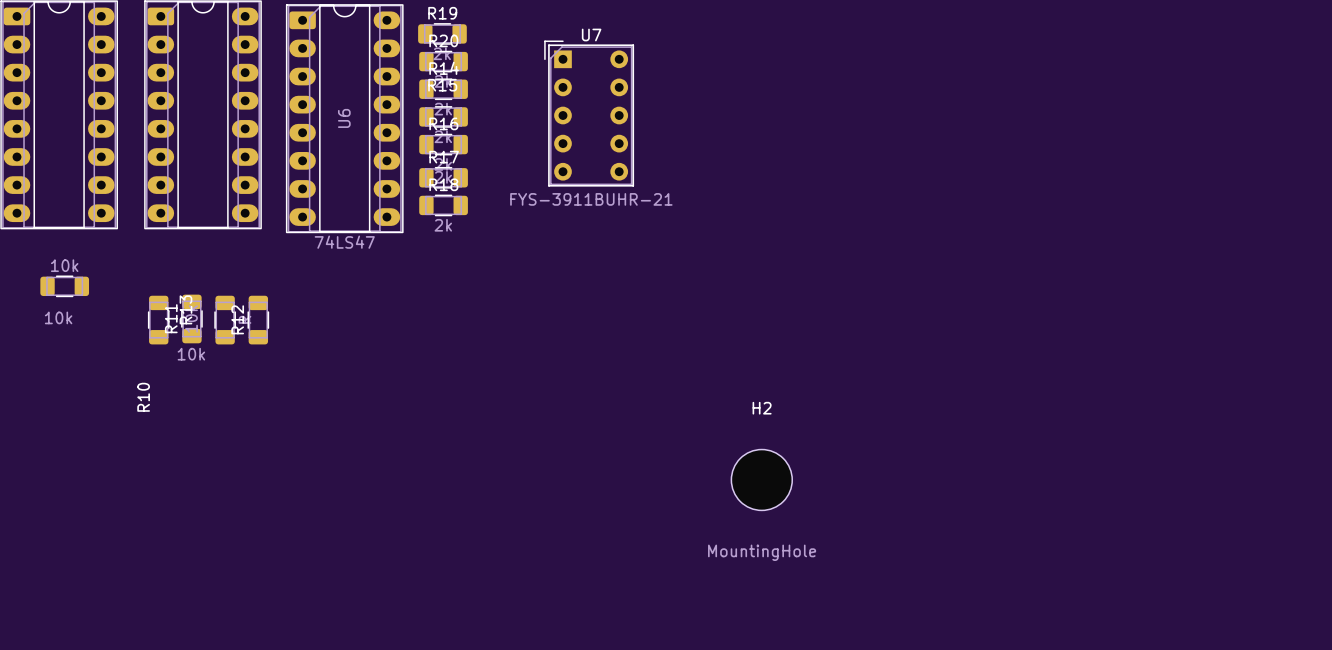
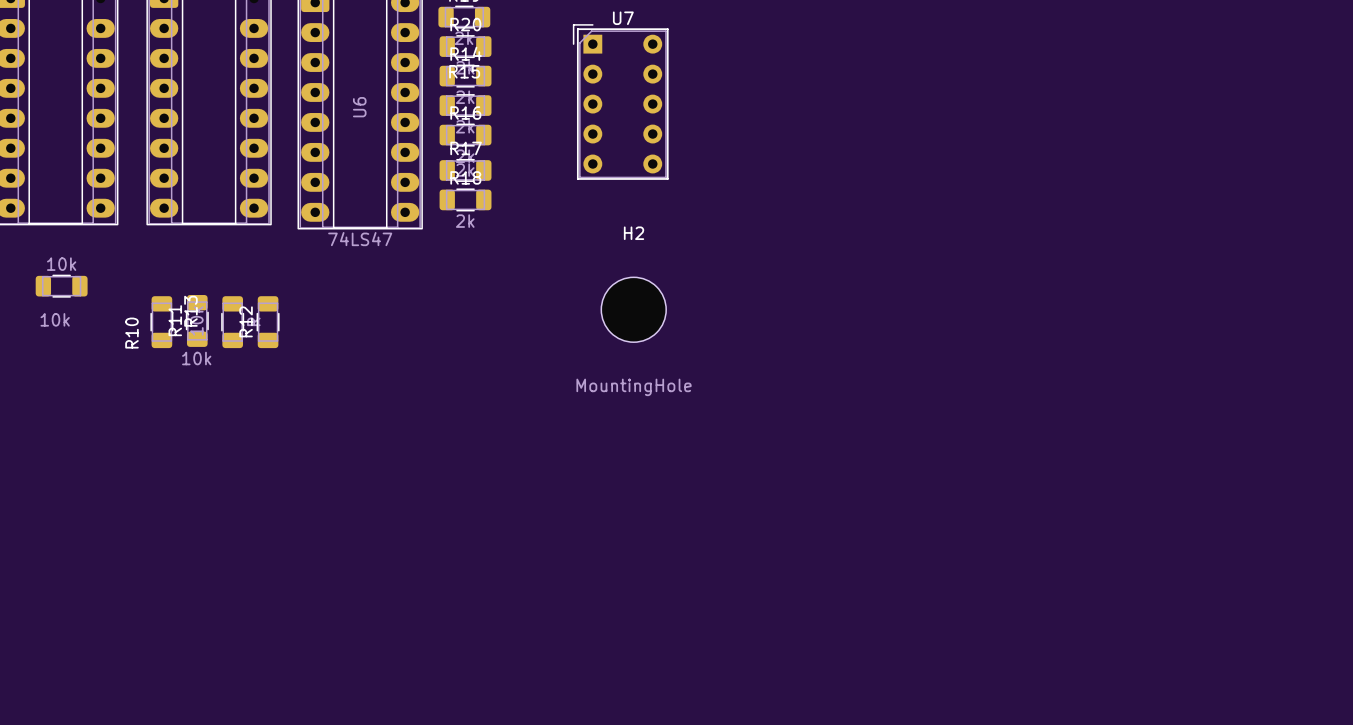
U7 value: FYS-3911BUHR-21 (591, 199) -> none
R10 name position: R10 (143, 397) -> R10 (131, 333)
H2 position: (761, 479) -> (633, 309)

